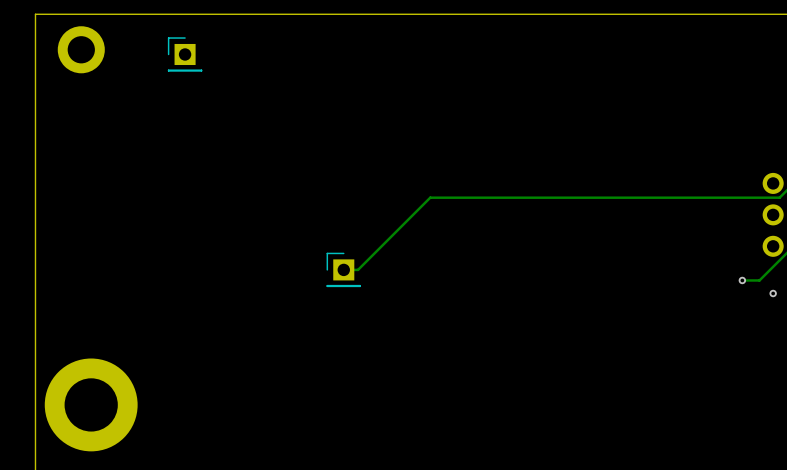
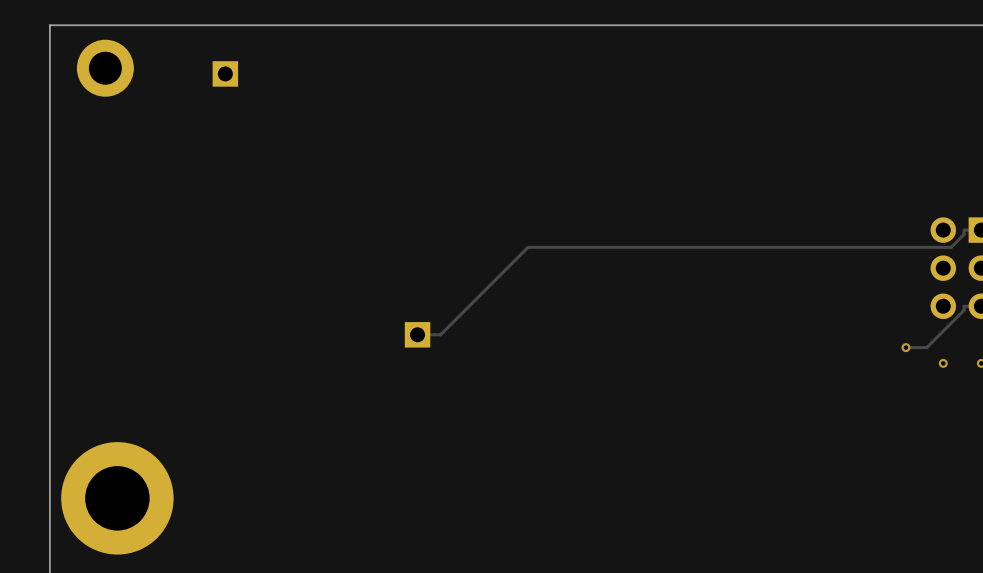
part side: bottom (185, 54) -> top (225, 73)
part side: bottom (343, 269) -> top (417, 334)

